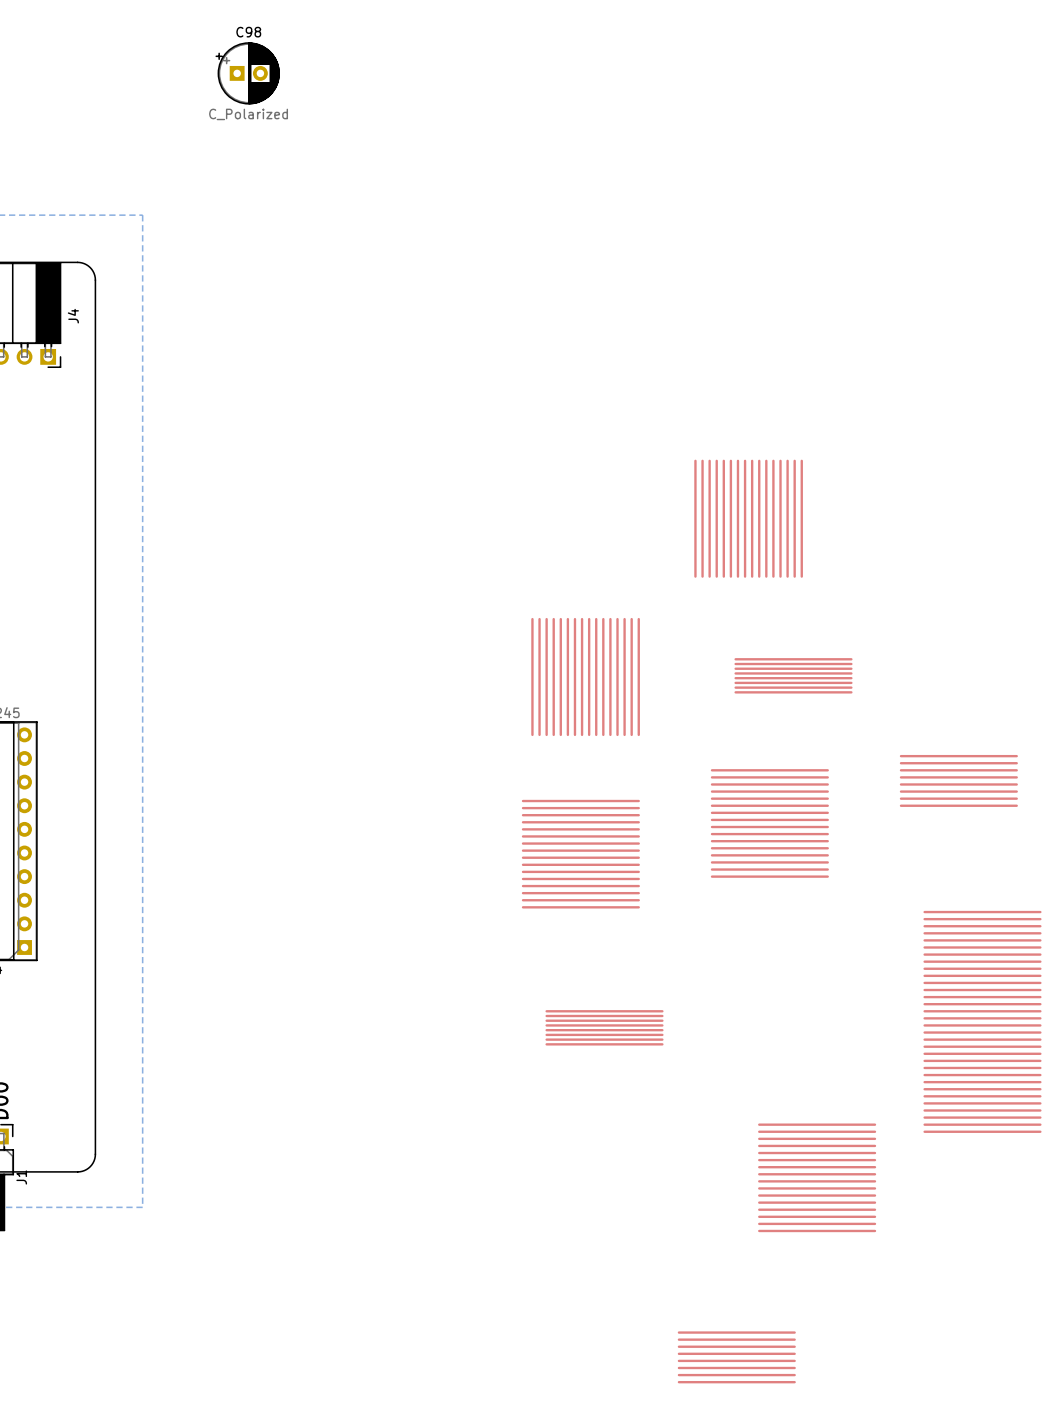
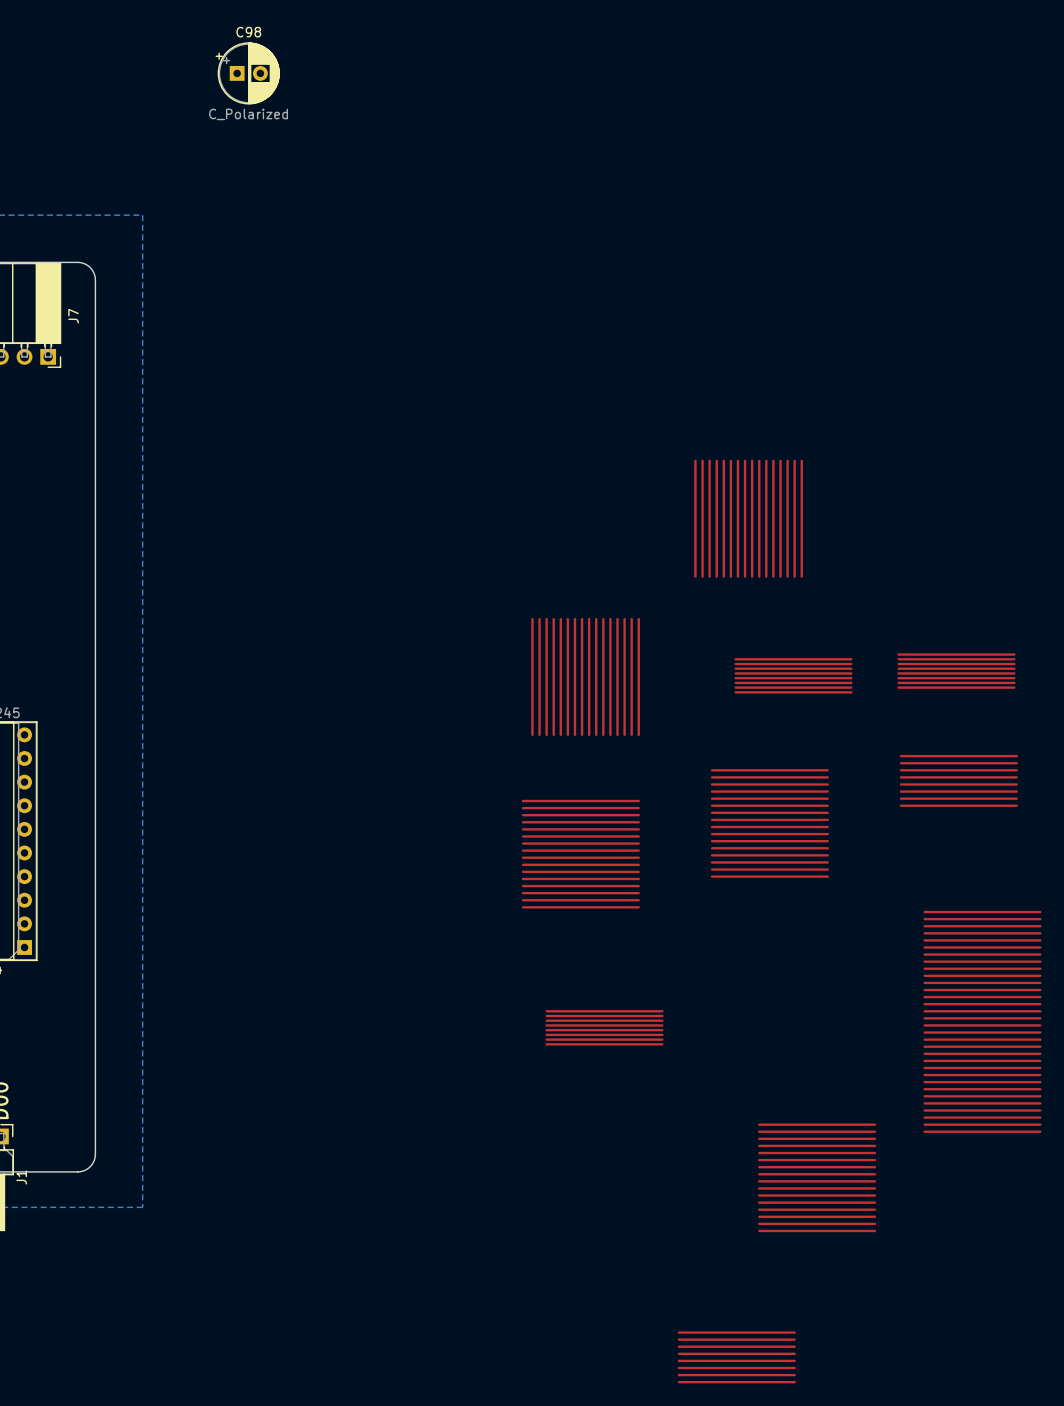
J4 name: J4 (73, 316) -> J7 (73, 316)
top track: none -> (898, 654) (1014, 654)
top track: none -> (898, 659) (1014, 659)
top track: none -> (898, 664) (1014, 664)
top track: none -> (898, 668) (1014, 668)
top track: none -> (898, 673) (1014, 673)
top track: none -> (898, 678) (1014, 678)
top track: none -> (898, 682) (1014, 682)
top track: none -> (898, 687) (1014, 687)

